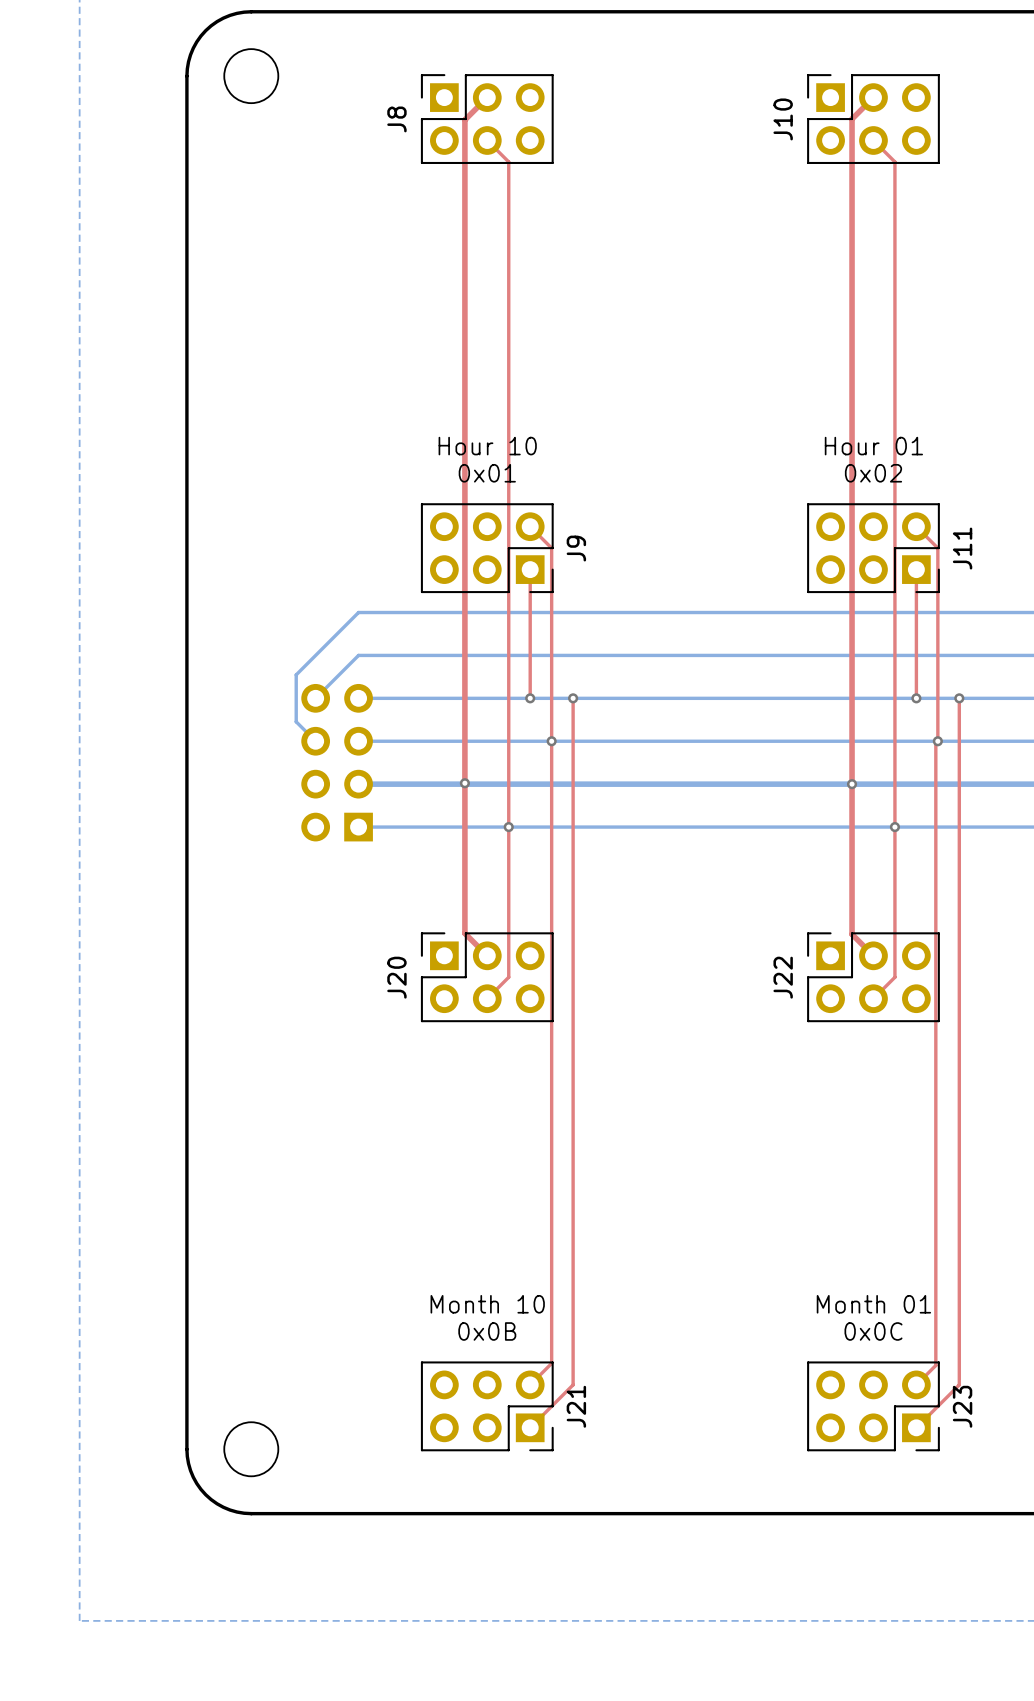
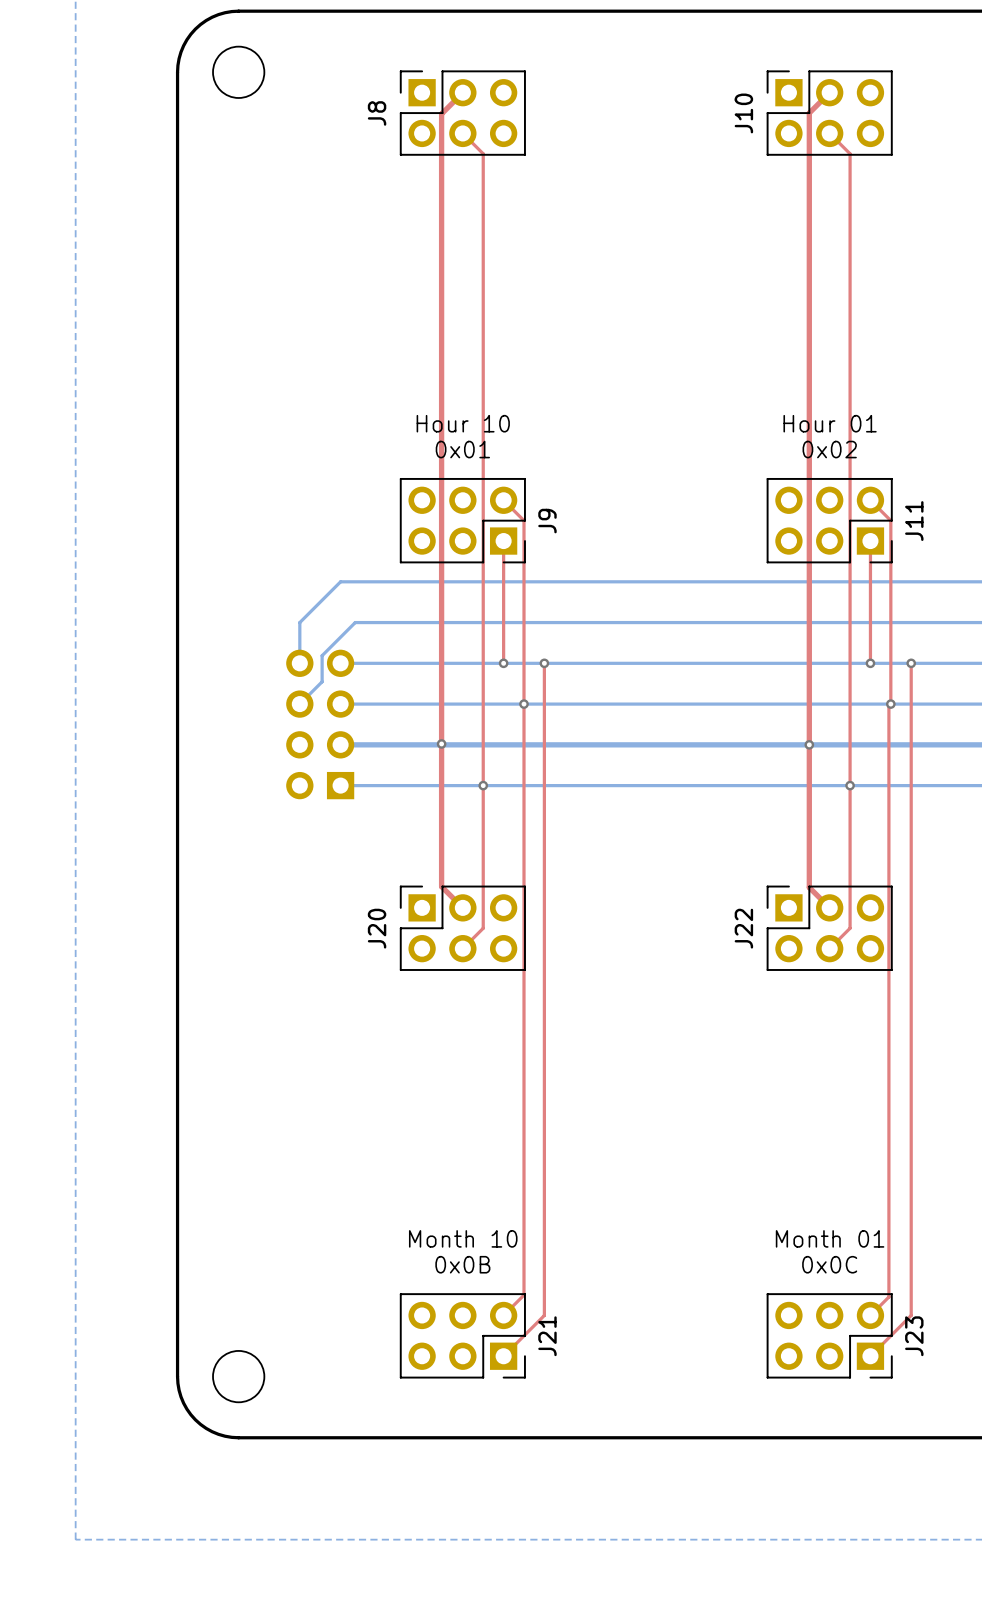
bottom track: (315, 655) (296, 674) (296, 721) (315, 741) -> (299, 622) (299, 663)
bottom track: (374, 655) (358, 655) (315, 698) -> (355, 622) (322, 655) (322, 681) (299, 704)

